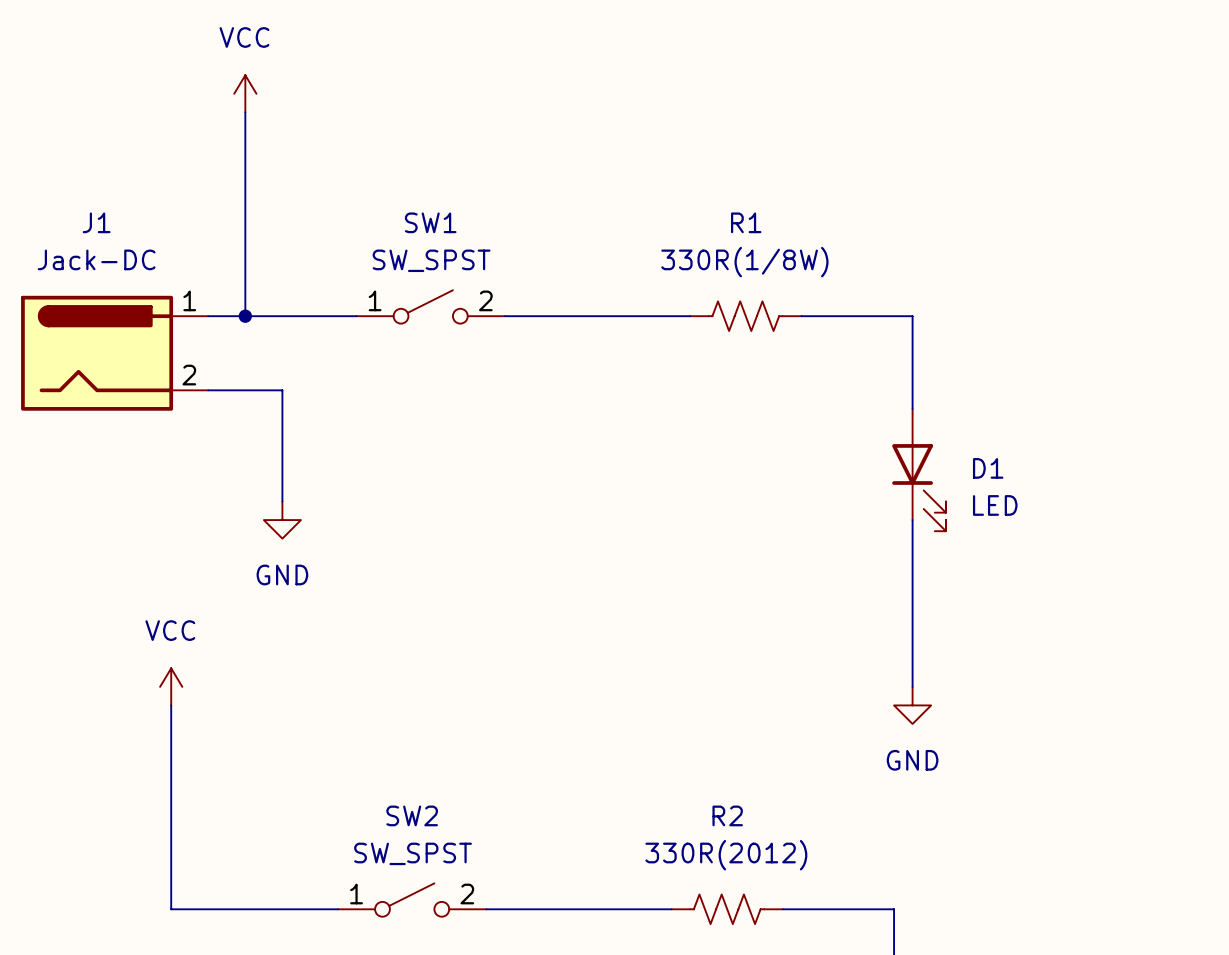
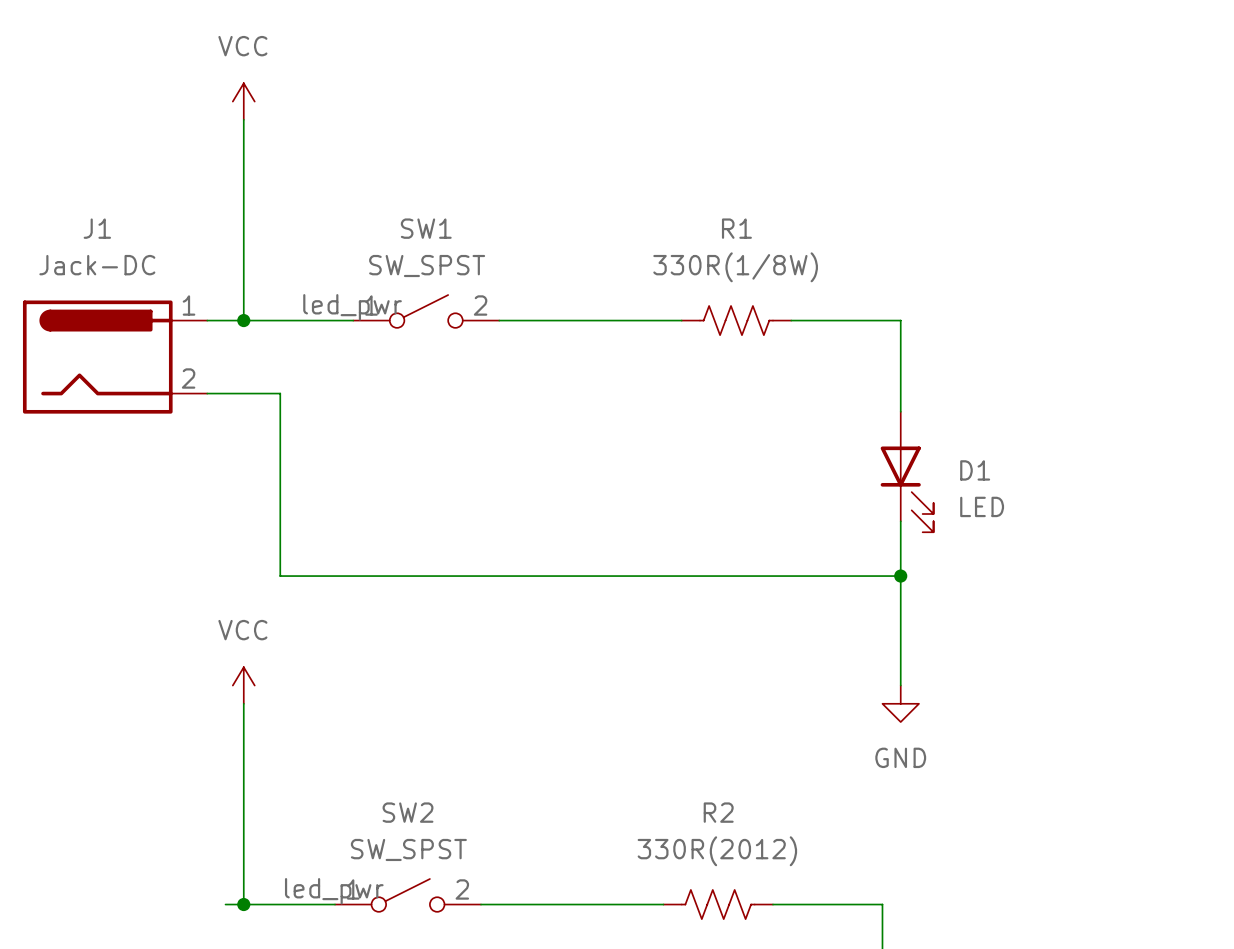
label: none -> led_pwr (352, 307)
wire: none -> (280, 503) (280, 576) (900, 576)
power symbol: GND (282, 520) -> none
junction: none -> (900, 576)
power symbol position: VCC (171, 686) -> VCC (243, 685)
wire: (171, 705) (171, 909) (226, 909) -> none
wire: none -> (243, 703) (243, 904)
label: none -> led_pwr (334, 891)
junction: none -> (243, 904)

